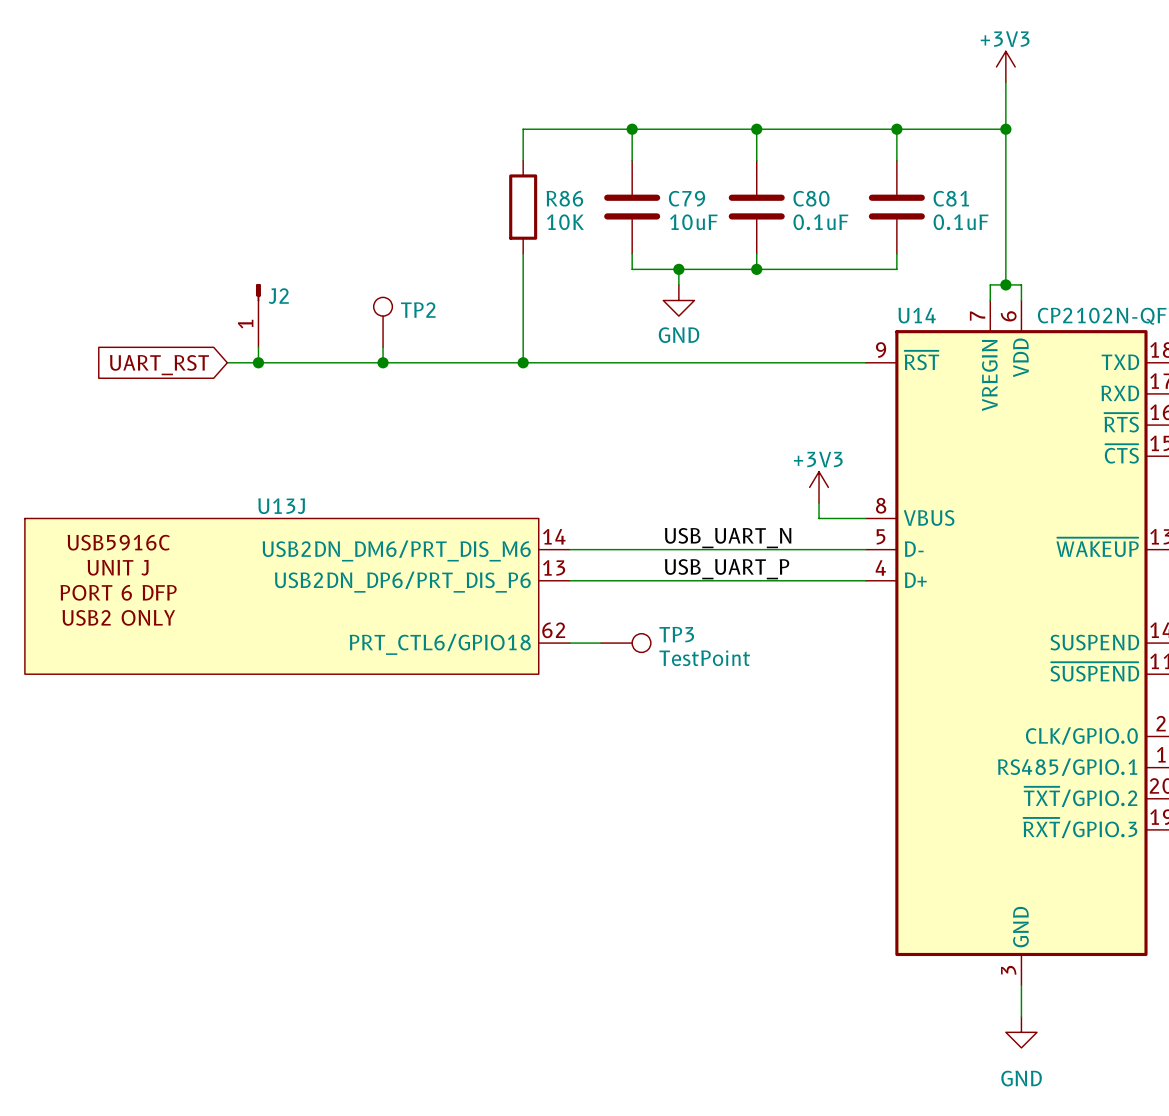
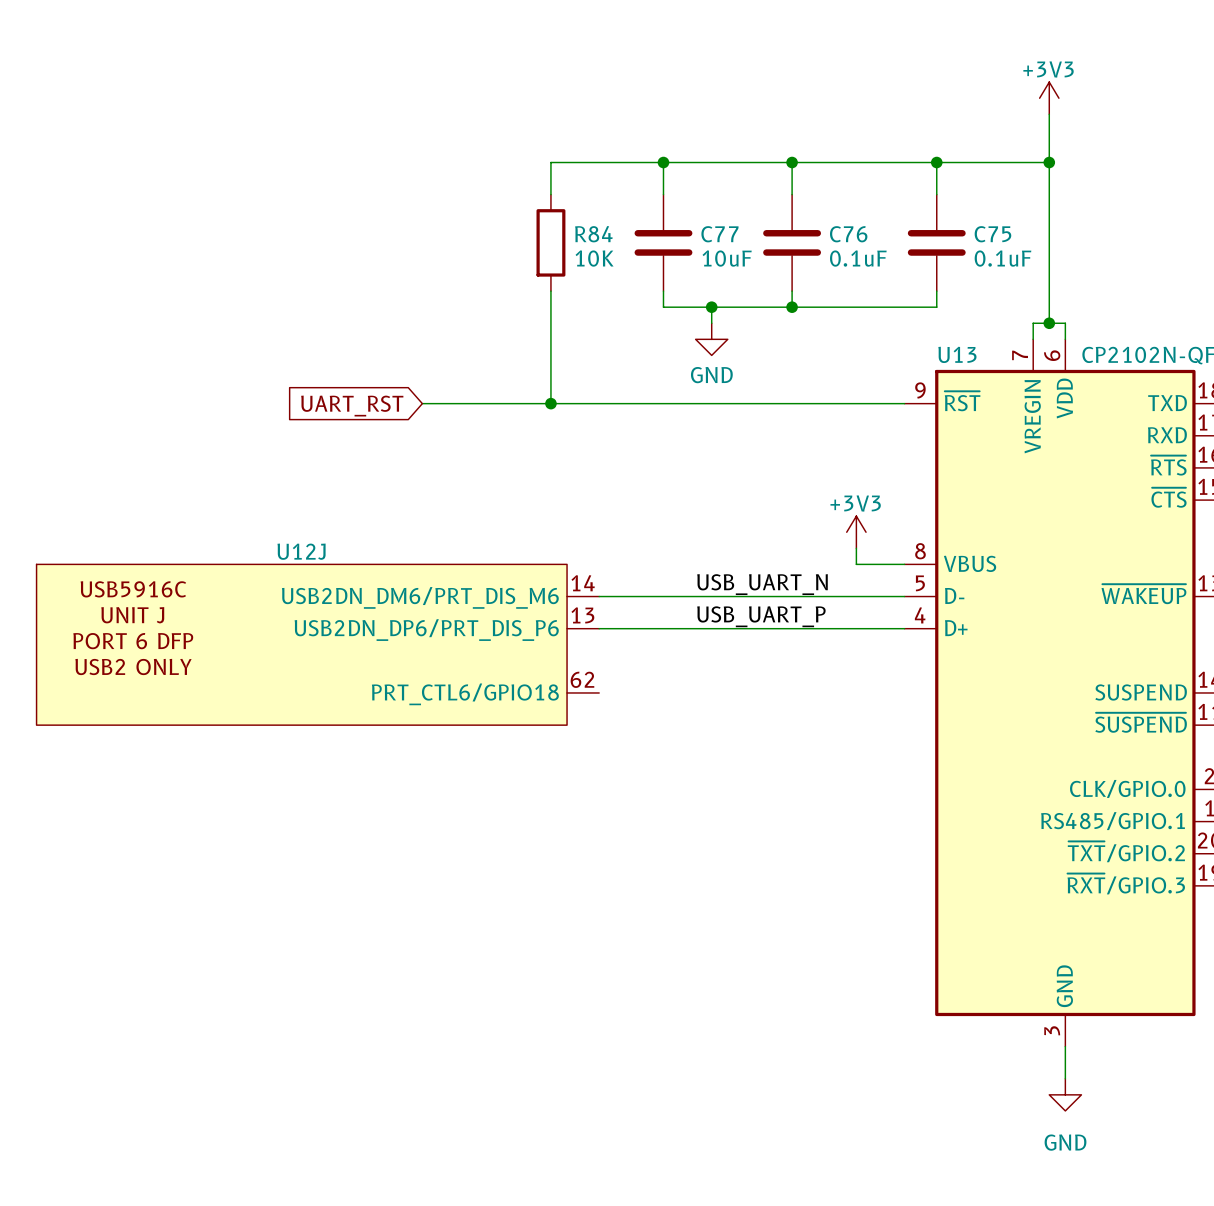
R86 name: R86 (564, 198) -> R84 (593, 234)
C79 name: C79 (686, 198) -> C77 (719, 234)
C80 name: C80 (811, 198) -> C76 (848, 234)
C81 name: C81 (951, 198) -> C75 (992, 234)
J2: (258, 315) -> none
U14 name: U14 (917, 315) -> U13 (957, 354)
TP2: (383, 322) -> none
wire: (258, 347) (258, 362) -> none
wire: (383, 347) (383, 362) -> none
wire: (227, 362) (398, 362) -> none
junction: (258, 362) -> none
junction: (383, 362) -> none
global label position: UART_RST (159, 365) -> UART_RST (352, 406)
U13J name: U13J (281, 506) -> U12J (301, 551)
wire: (569, 643) (601, 643) -> none
TP3: TestPoint (625, 643) -> none

